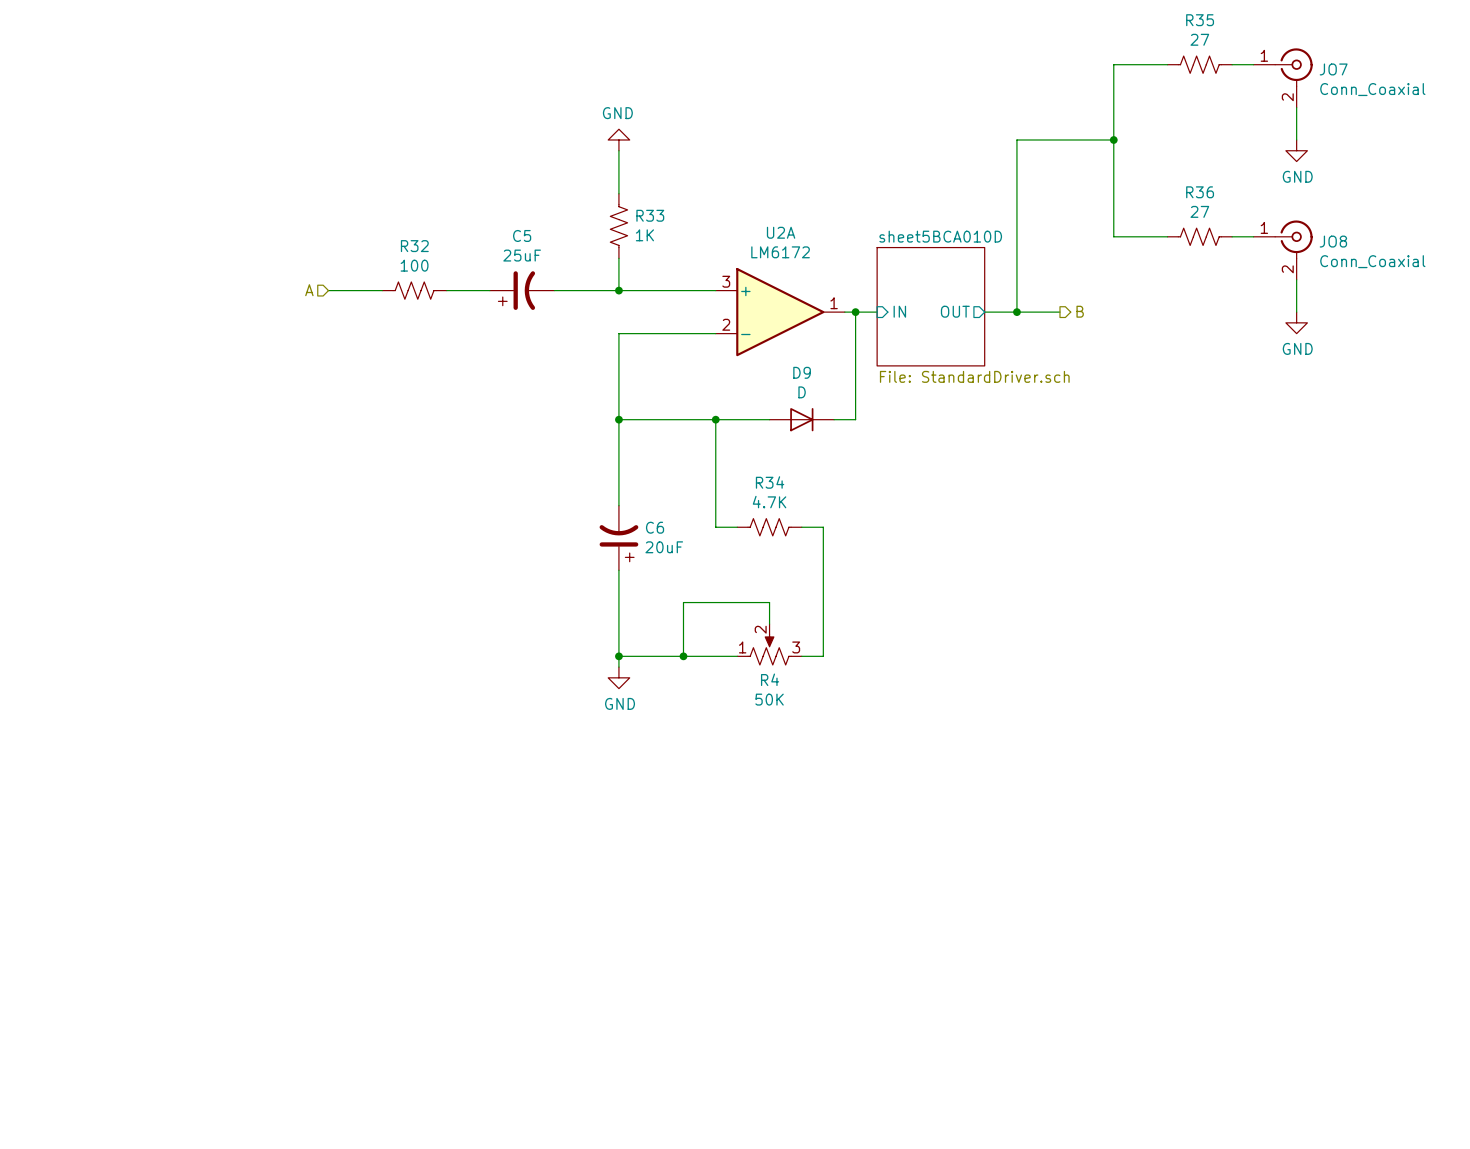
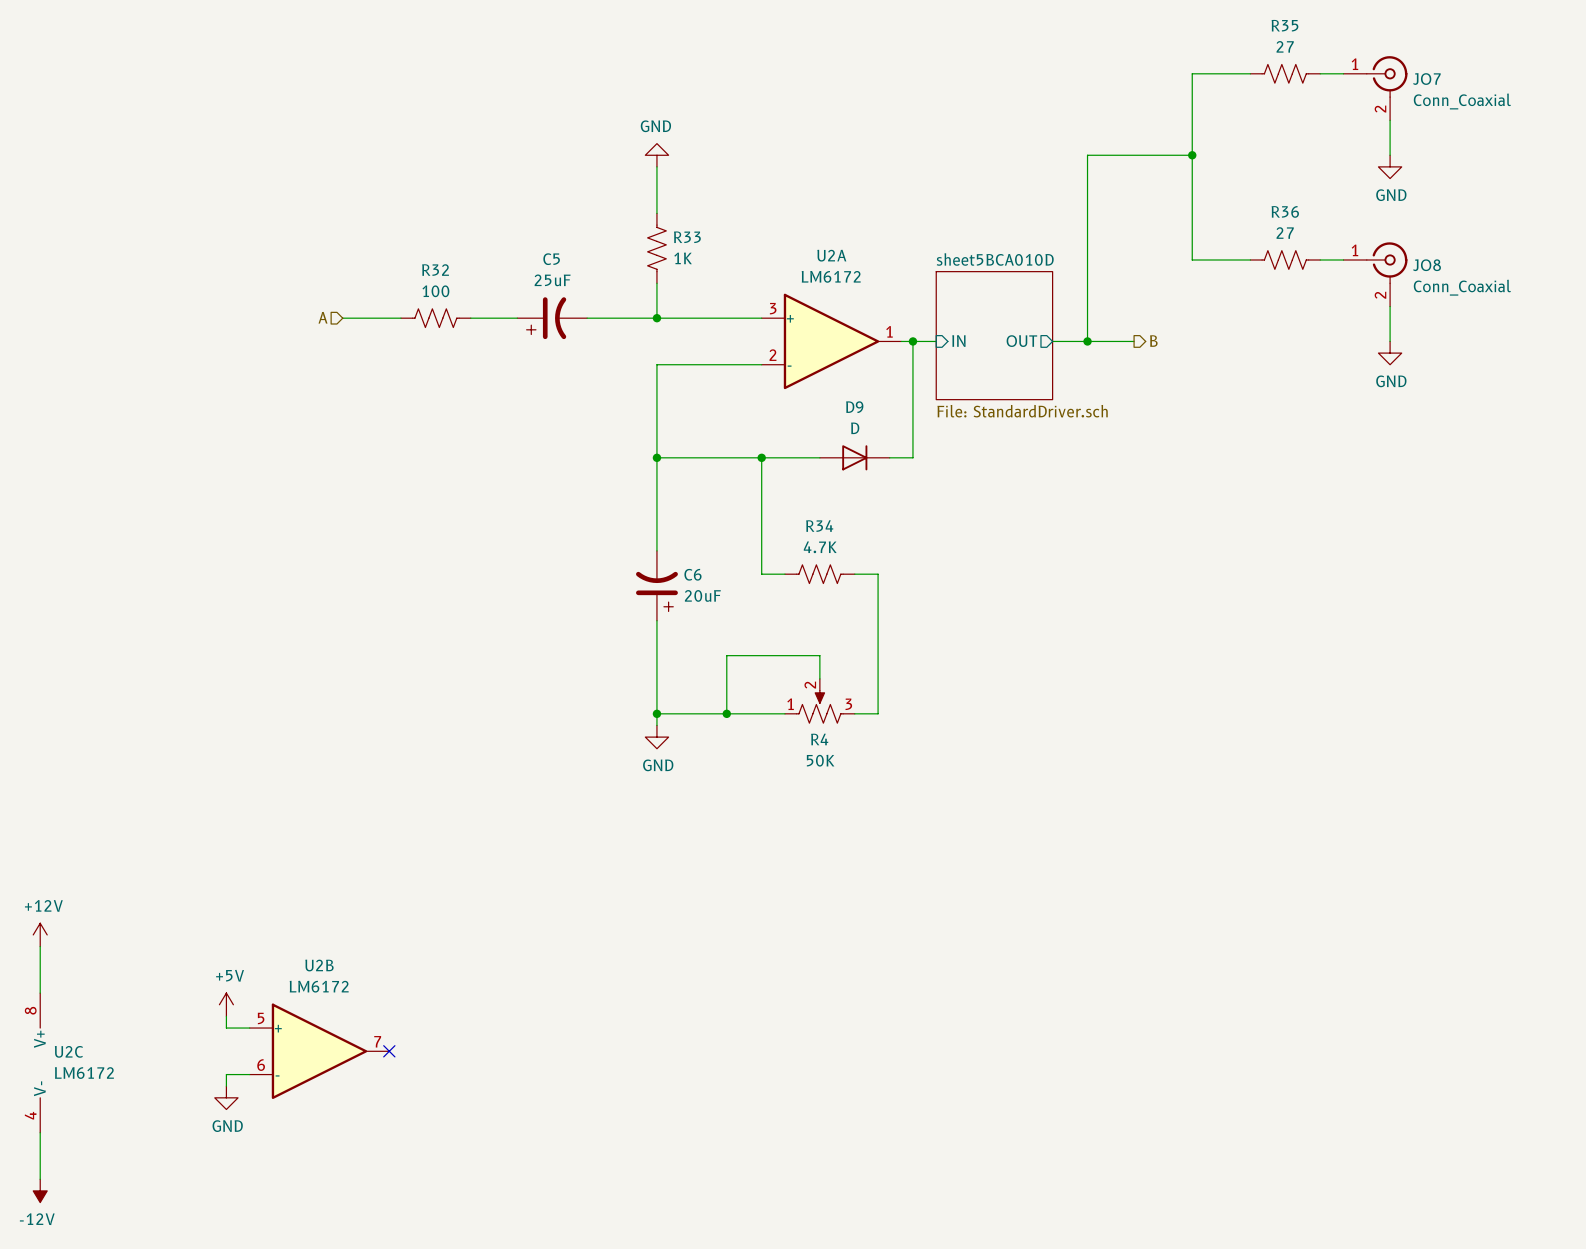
power symbol: none -> +12V (40, 934)
wire: none -> (40, 946) (40, 993)
power symbol: none -> +5V (226, 1004)
wire: none -> (226, 1016) (226, 1028) (249, 1028)
U2B: none -> LM6172 (319, 1051)
no-connect mark: none -> (389, 1051)
U2C: none -> LM6172 (40, 1062)
wire: none -> (249, 1074) (226, 1074) (226, 1086)
power symbol: none -> GND (226, 1097)
wire: none -> (40, 1132) (40, 1179)
power symbol: none -> -12V (40, 1190)

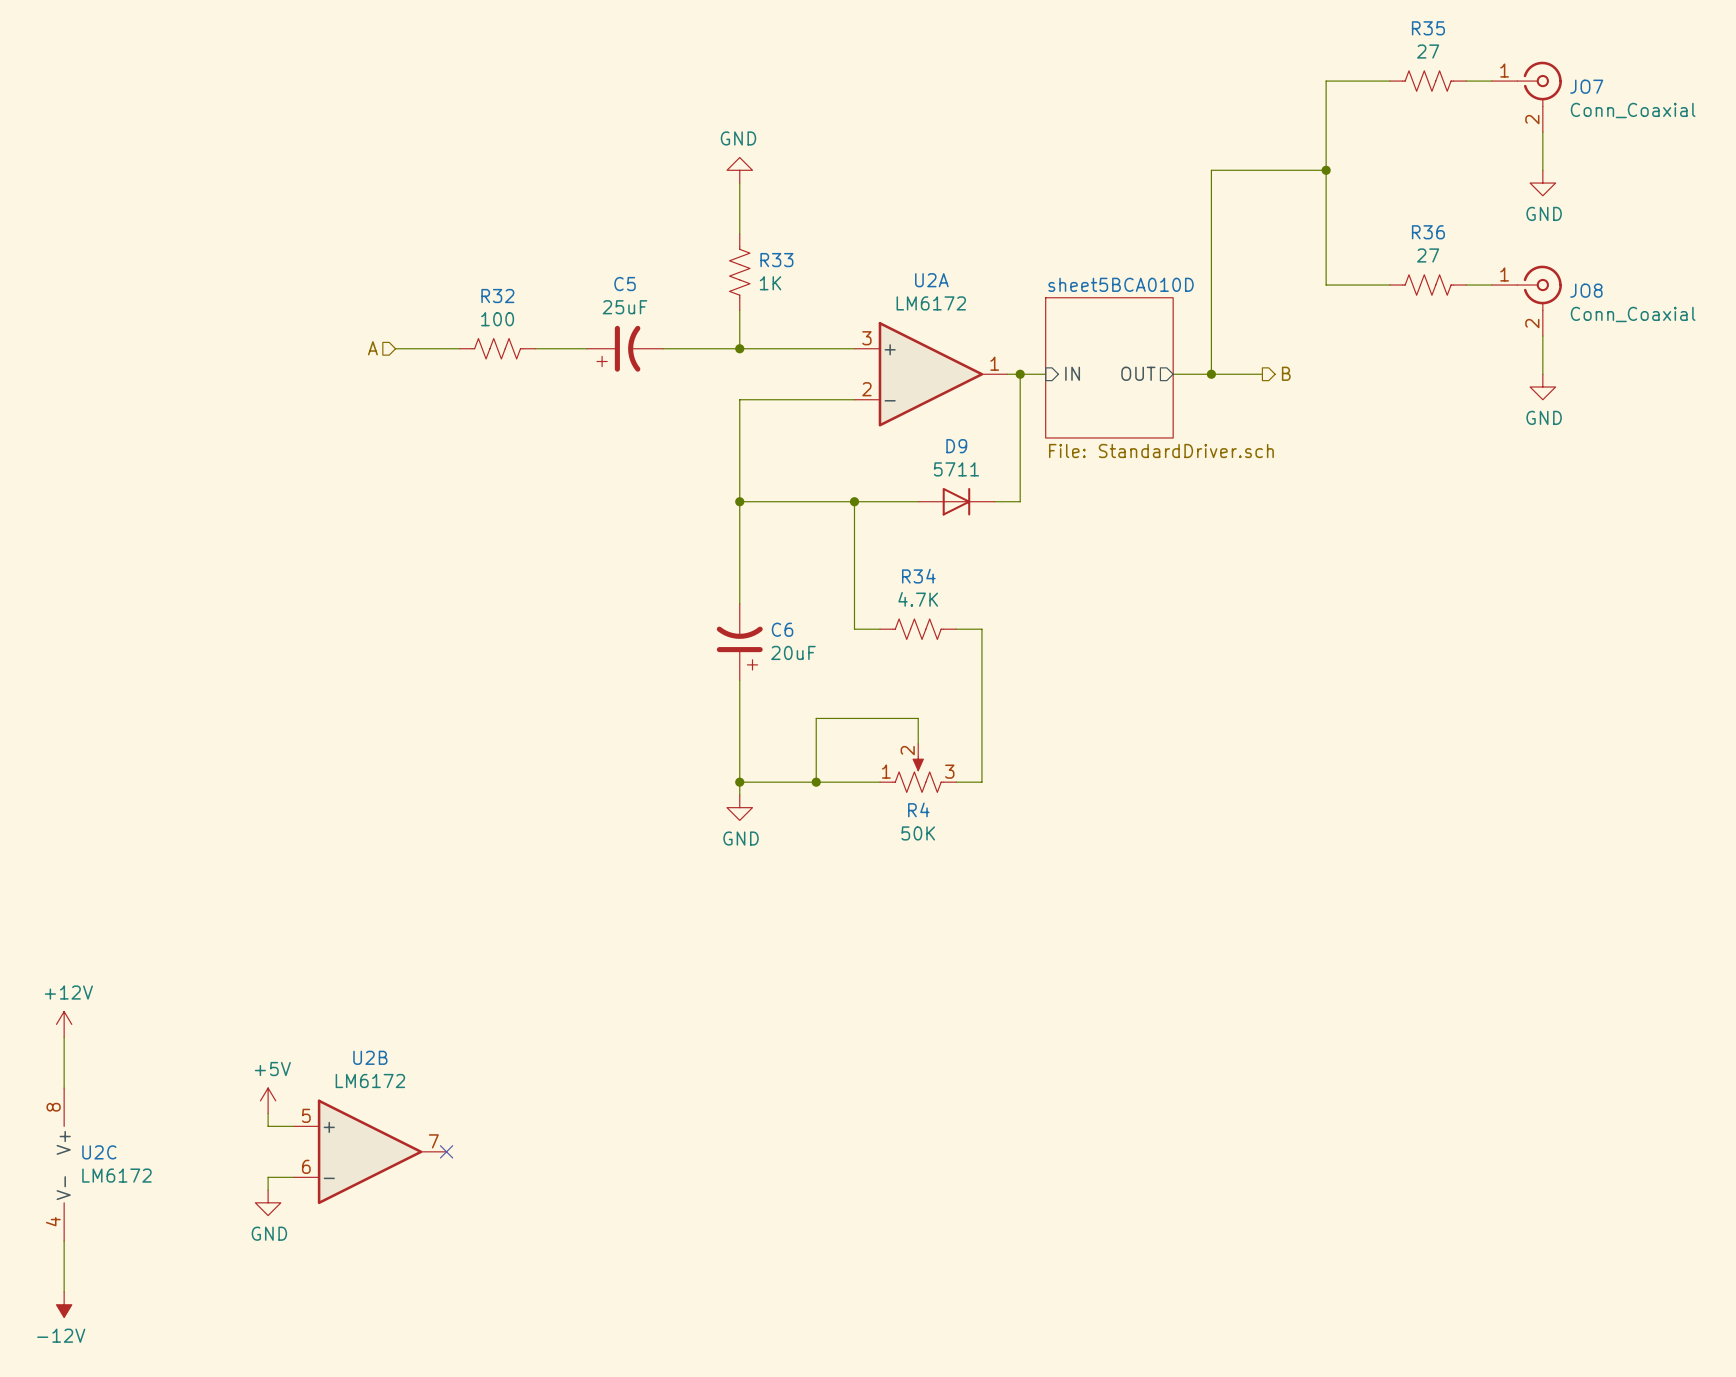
D9 value: D (855, 428) -> 5711 (956, 469)

